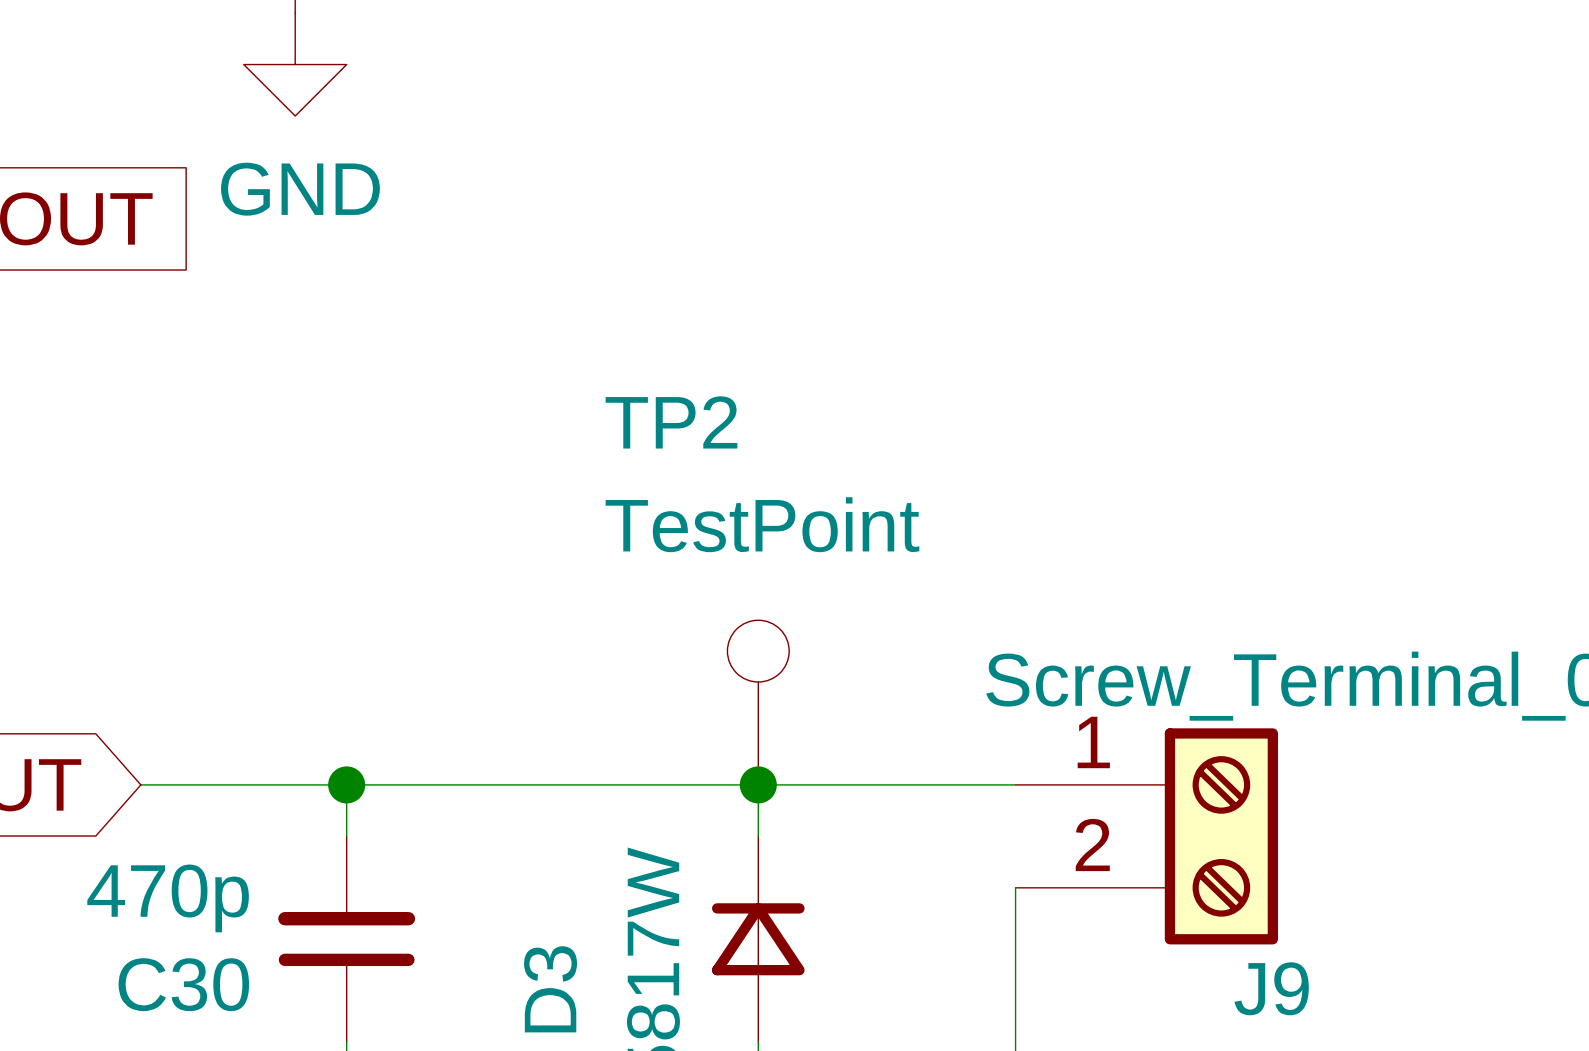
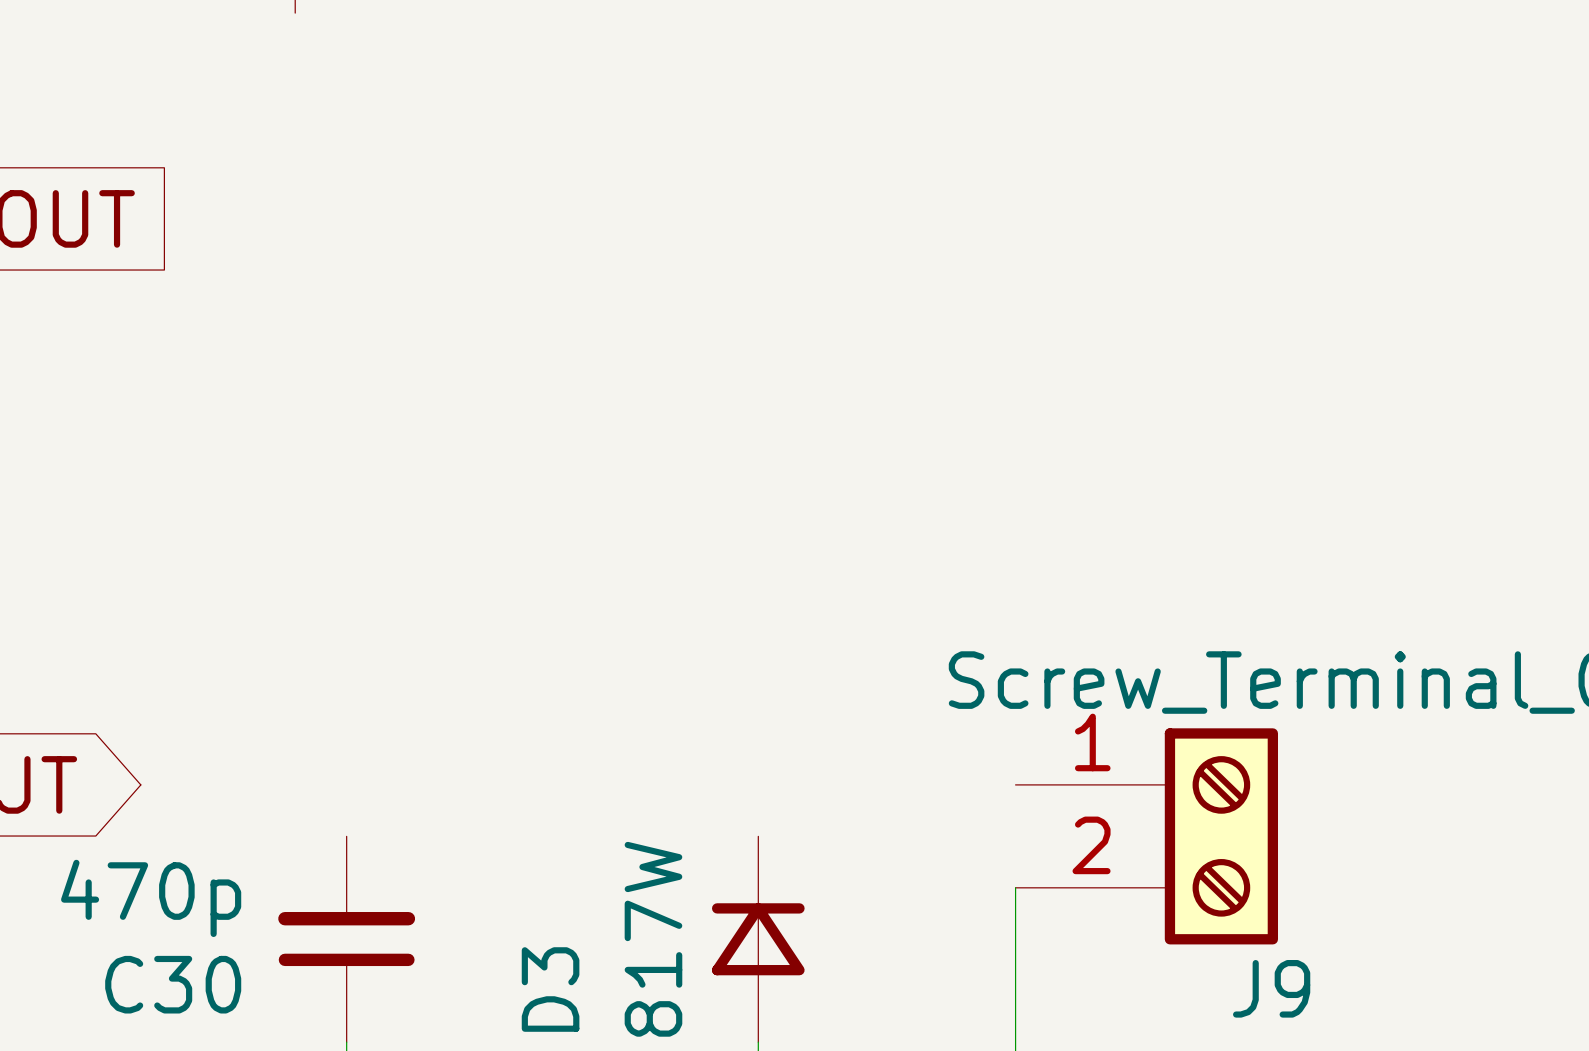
power symbol: GND (295, 64) -> none
TP2: TestPoint (758, 702) -> none
wire: (140, 784) (1015, 784) -> none
wire: (346, 784) (346, 836) -> none
junction: (346, 784) -> none
wire: (758, 784) (758, 836) -> none
junction: (758, 784) -> none

